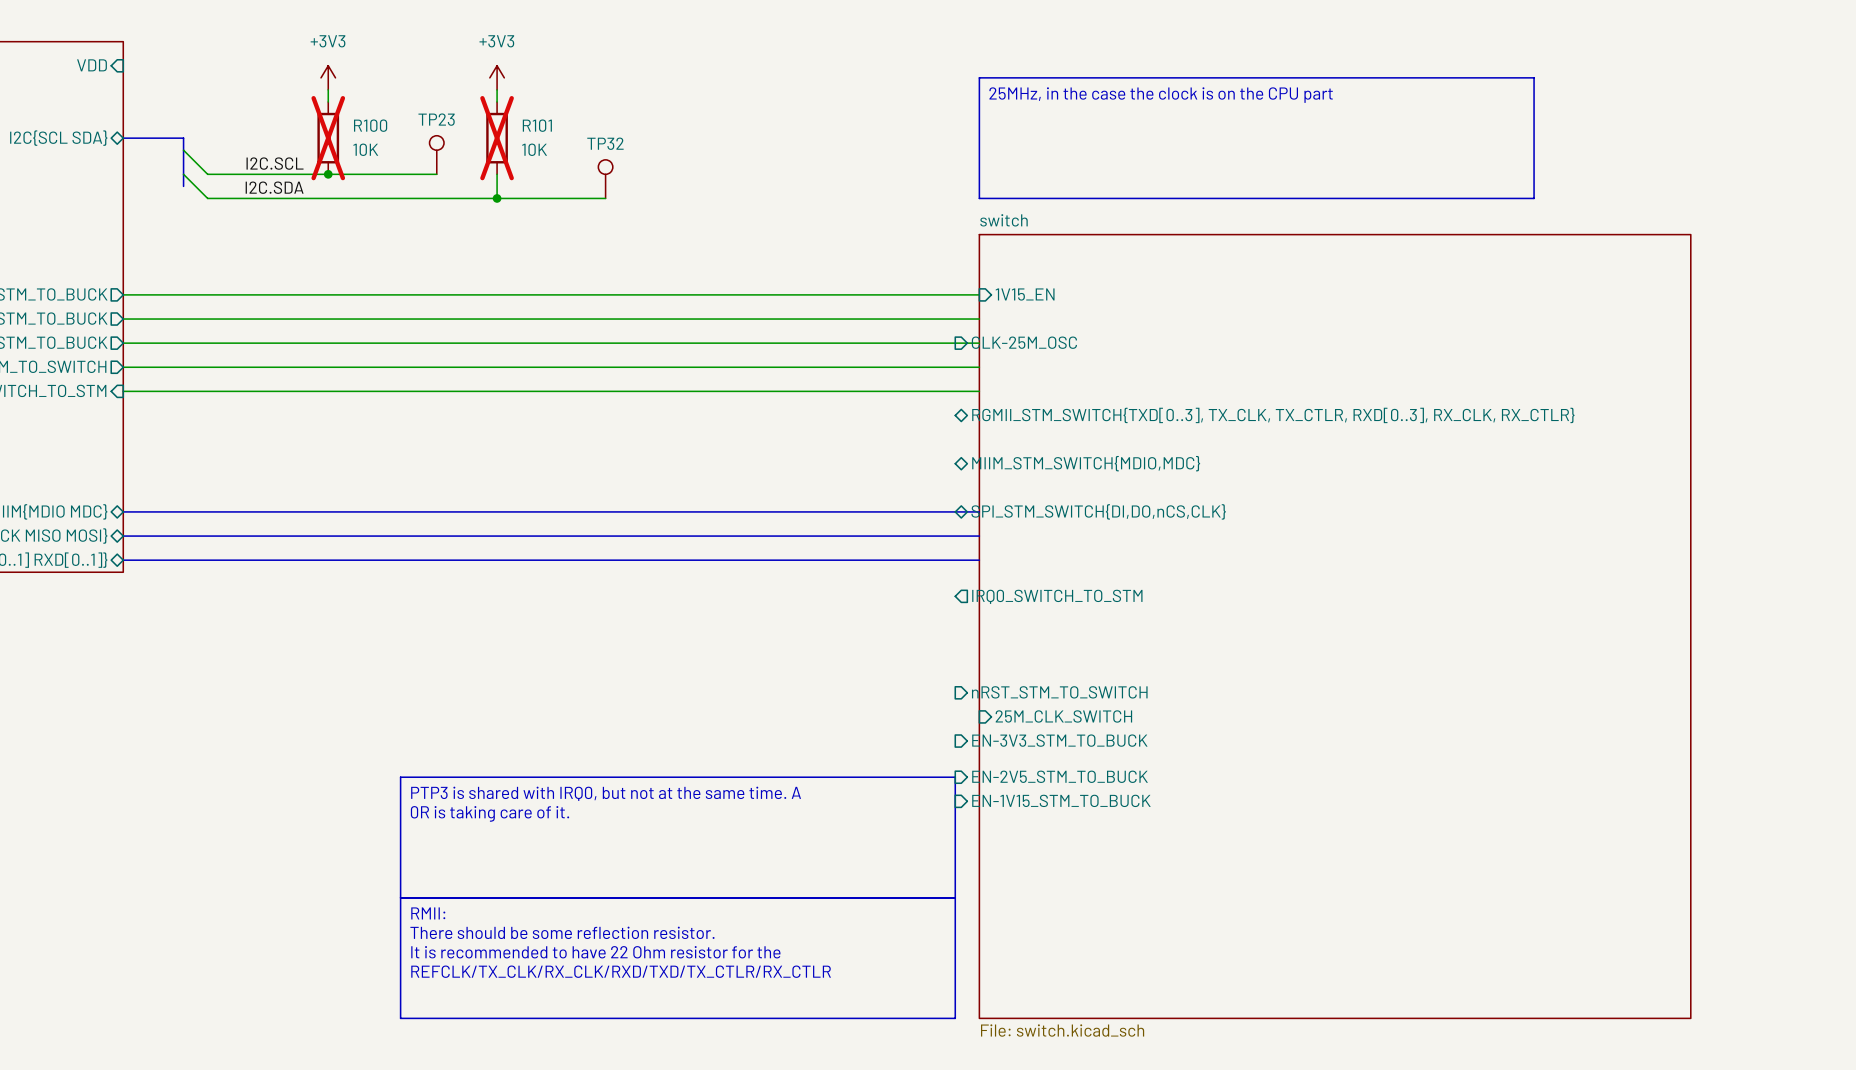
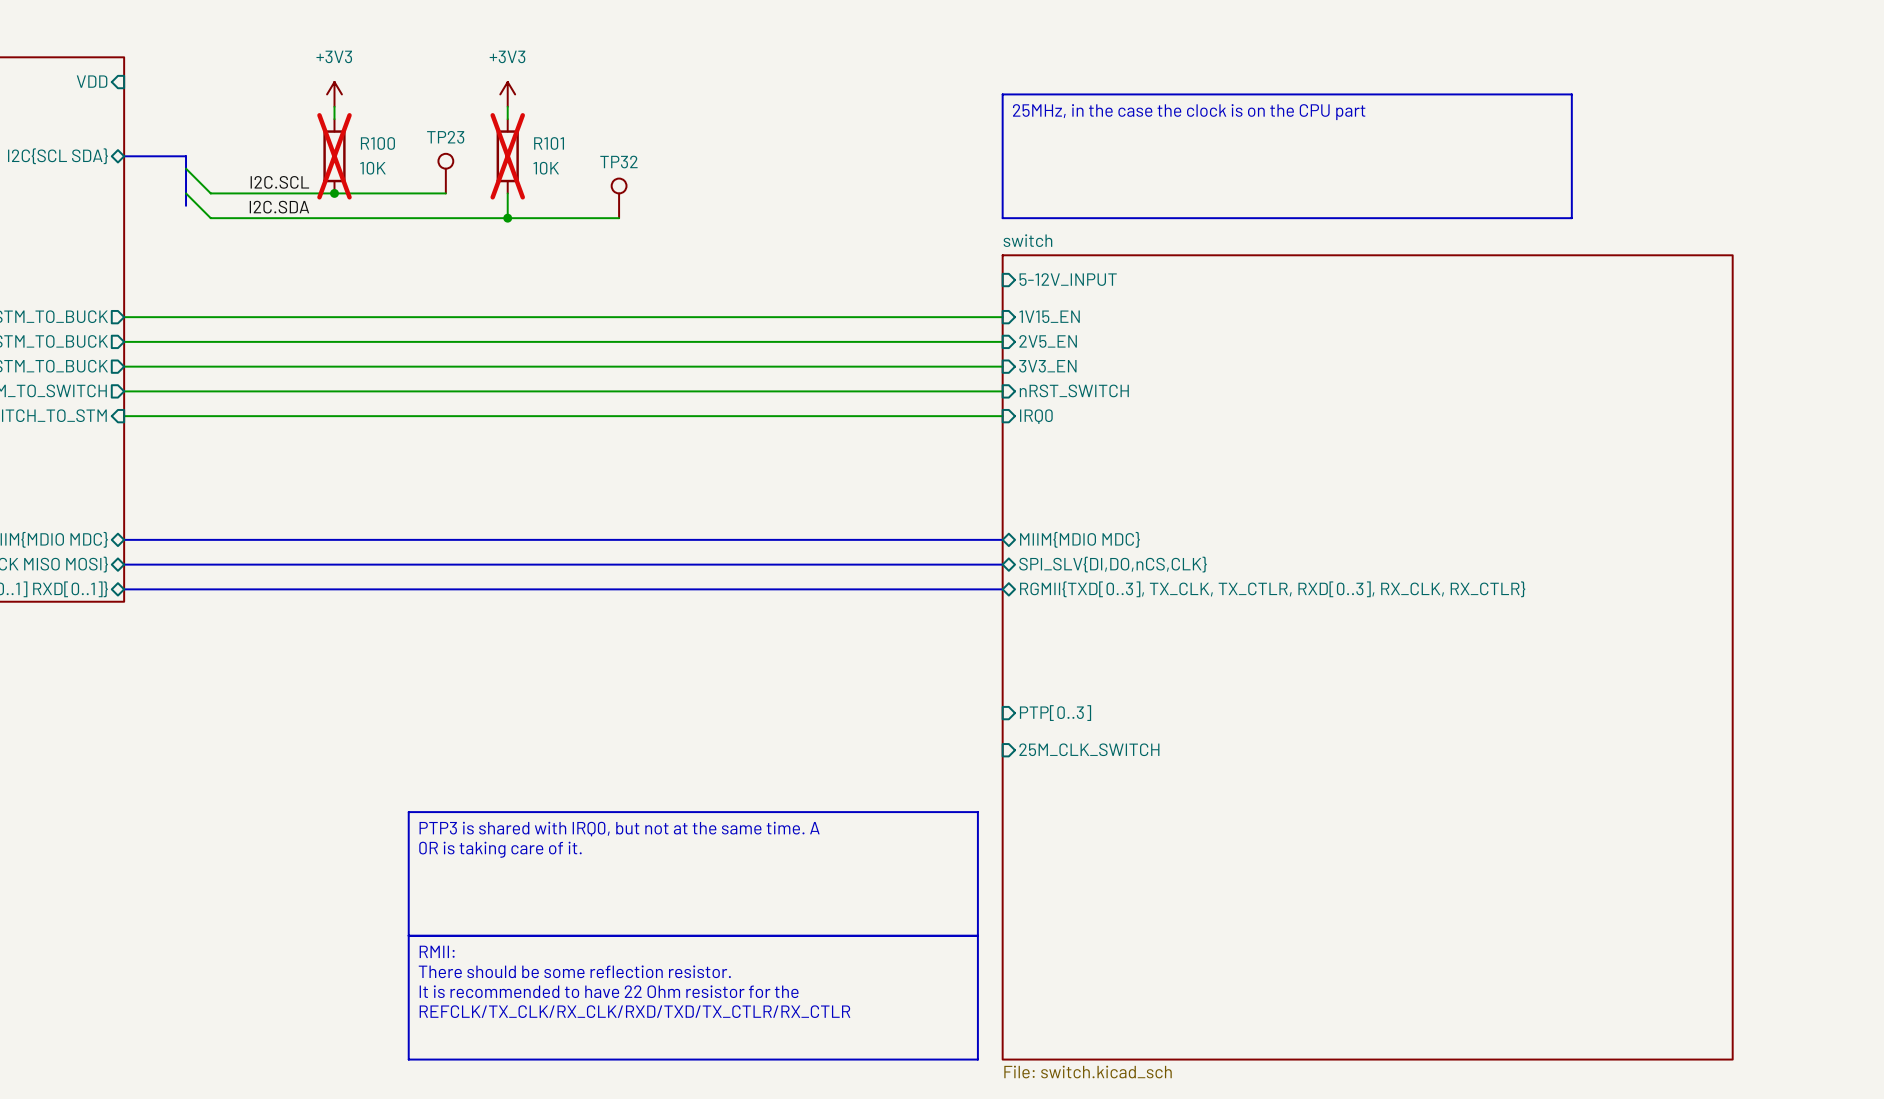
sheet pin: none -> 5-12V_INPUT (1068, 279)
sheet pin: none -> 2V5_EN (1048, 341)
sheet pin: none -> 3V3_EN (1047, 366)
sheet pin: CLK-25M_OSC (1024, 342) -> none
sheet pin: none -> nRST_SWITCH (1074, 390)
sheet pin: none -> IRQ0 (1036, 416)
sheet pin: RGMII_STM_SWITCH{TXD[0..3], TX_CLK, TX_CTLR, RXD[0..3], RX_CLK, RX_CTLR} (1273, 415) -> none
sheet pin: MIIM_STM_SWITCH{MDIO,MDC} (1086, 463) -> none
sheet pin: none -> MIIM{MDIO MDC} (1079, 539)
sheet pin: SPI_STM_SWITCH{DI,DO,nCS,CLK} (1098, 511) -> SPI_SLV{DI,DO,nCS,CLK} (1113, 564)
sheet pin: none -> RGMII{TXD[0..3], TX_CLK, TX_CTLR, RXD[0..3], RX_CLK, RX_CTLR} (1272, 589)
sheet pin: IRQ0_SWITCH_TO_STM (1057, 596) -> none
sheet pin: none -> PTP[0..3] (1055, 713)
sheet pin: nRST_STM_TO_SWITCH (1059, 692) -> none
sheet pin: EN-3V3_STM_TO_BUCK (1059, 740) -> none
sheet pin: EN-2V5_STM_TO_BUCK (1060, 776) -> none
sheet pin: EN-1V15_STM_TO_BUCK (1061, 800) -> none

